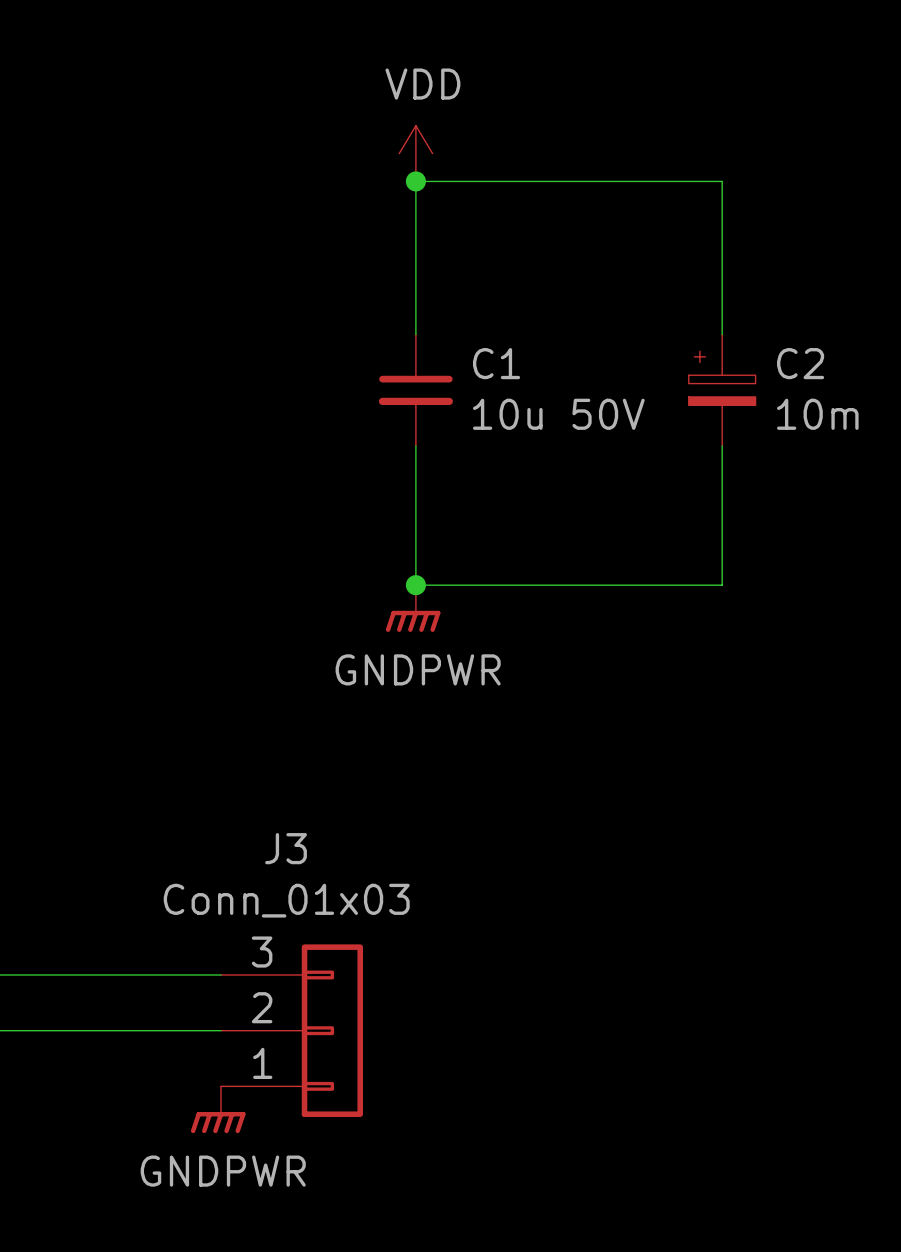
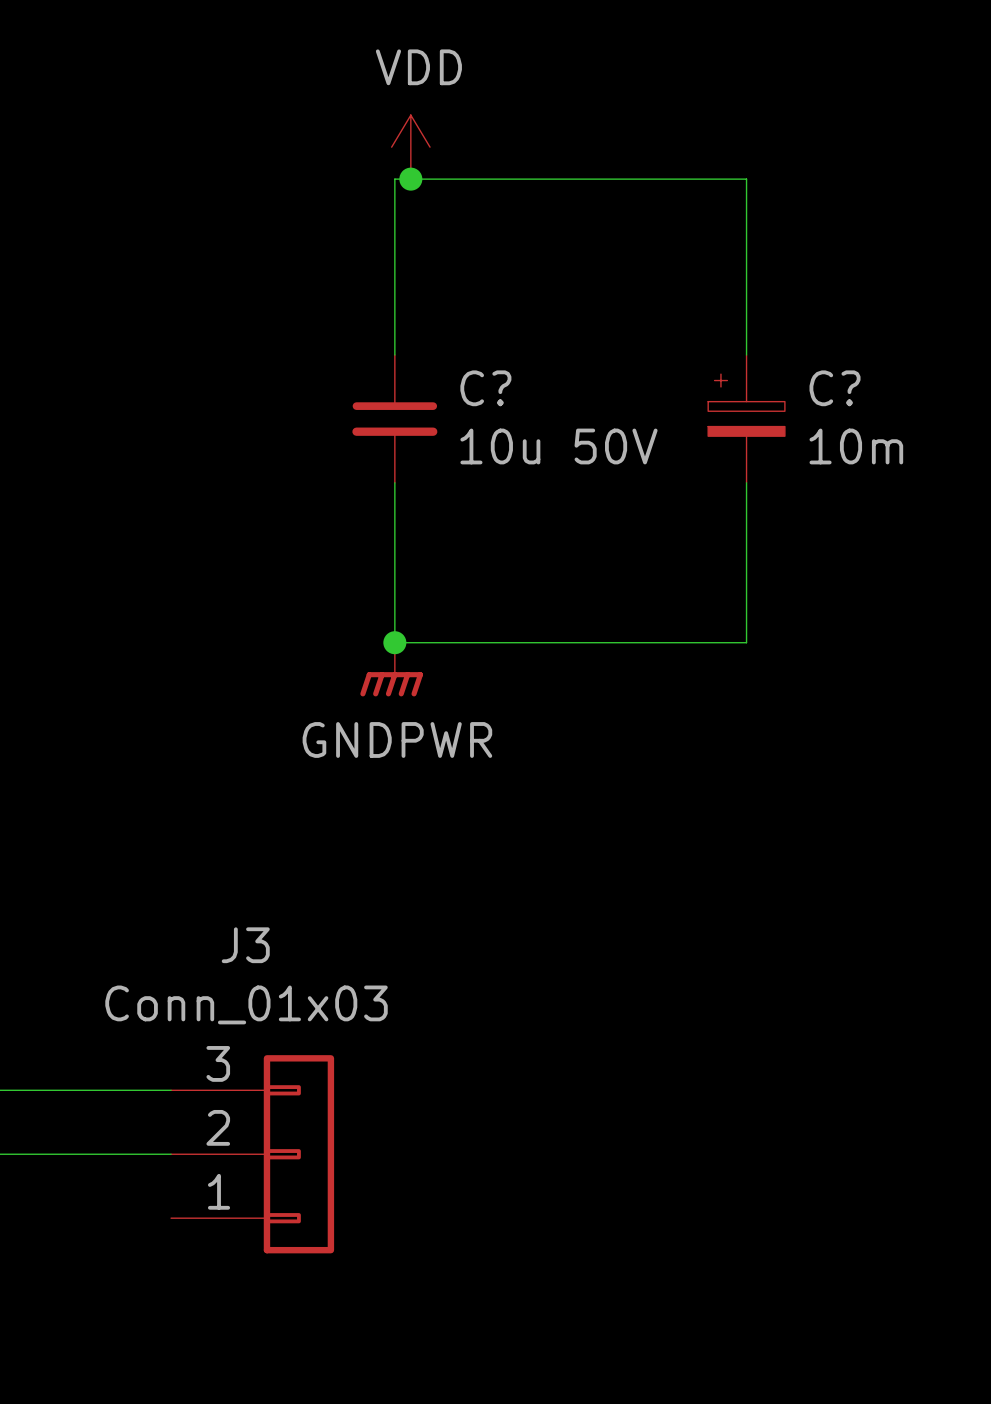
power symbol position: VDD (415, 153) -> VDD (410, 147)
junction position: (415, 181) -> (410, 179)
C1 name: C1 (496, 363) -> C? (485, 388)
C2 name: C2 (800, 363) -> C? (835, 388)
power symbol: GNDPWR (218, 1109) -> none

